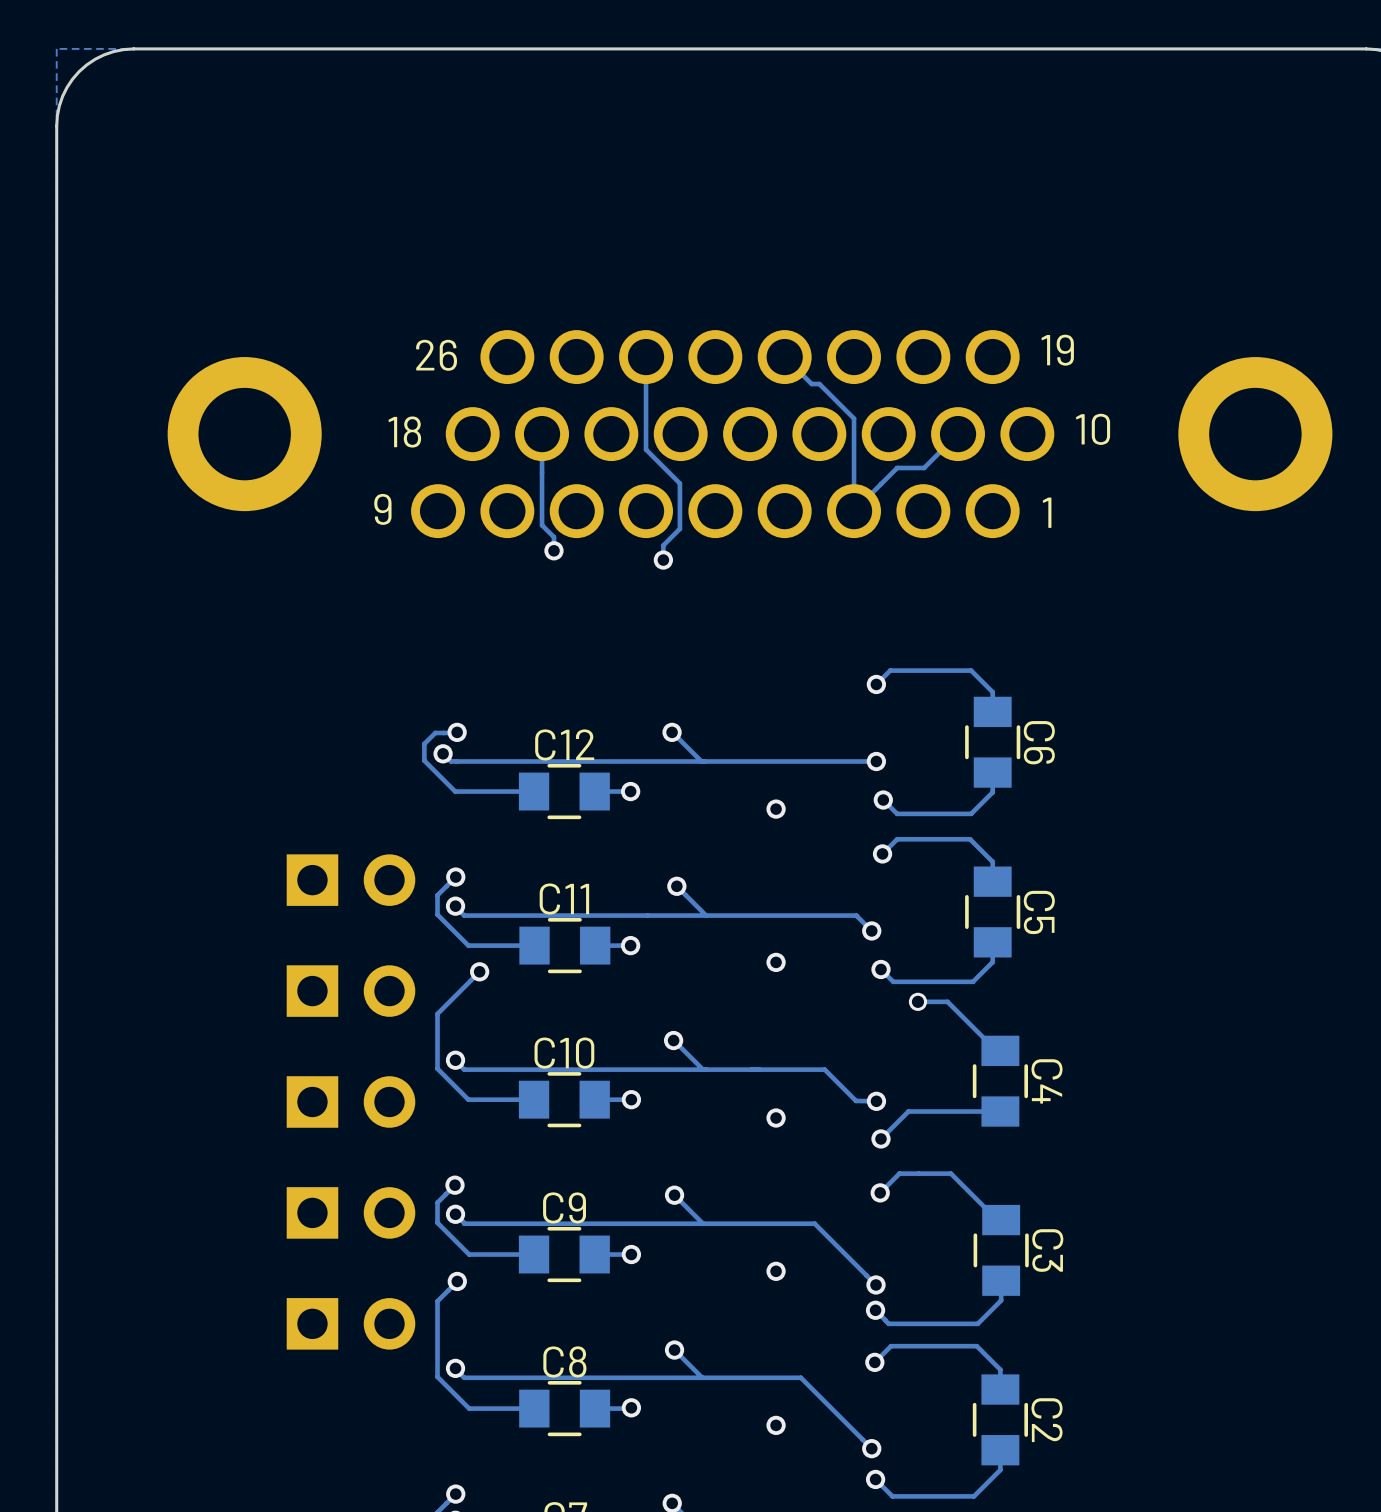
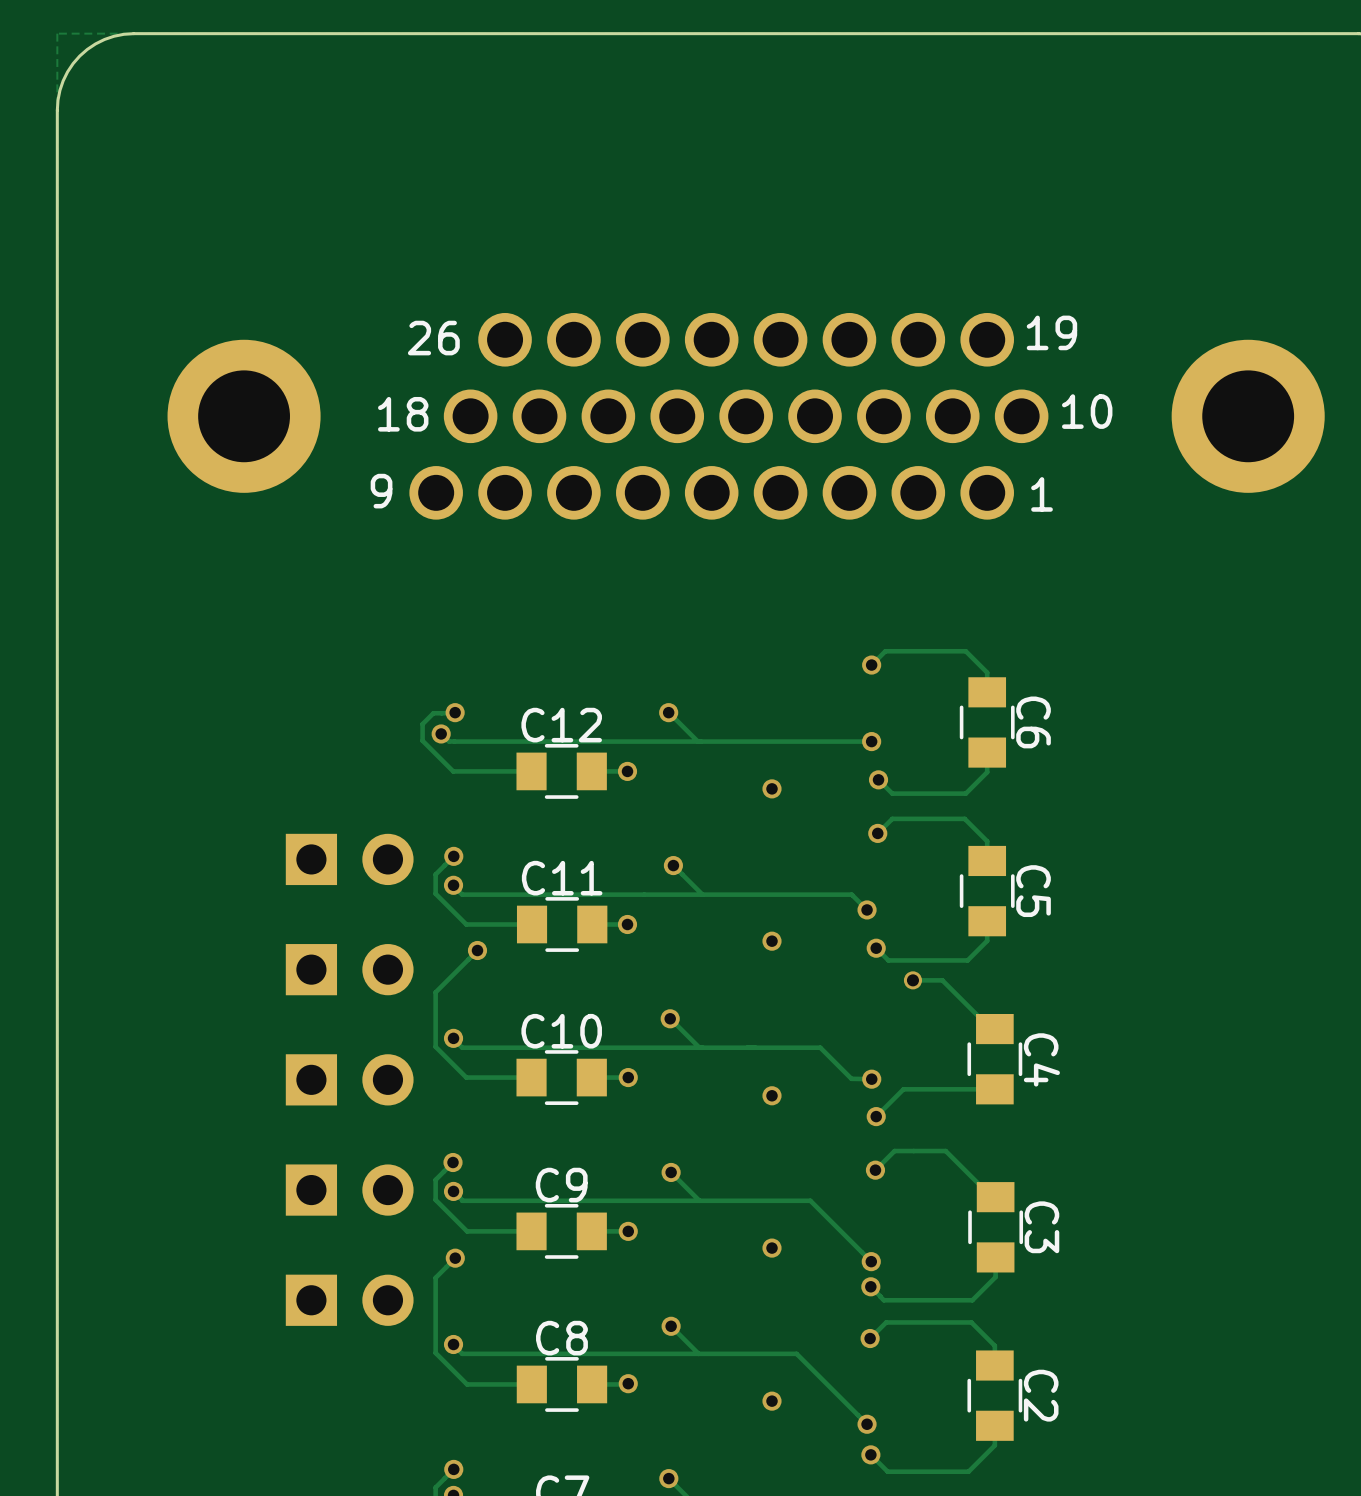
track: (646, 357) (646, 449) (679, 483) (679, 528) (663, 545) (663, 560) -> none
track: (784, 357) (811, 384) (819, 384) (854, 418) (854, 511) (897, 467) (924, 467) (958, 434) -> none
track: (542, 434) (542, 525) (553, 537) (553, 550) -> none
via: (553, 550) -> none
via: (663, 560) -> none

